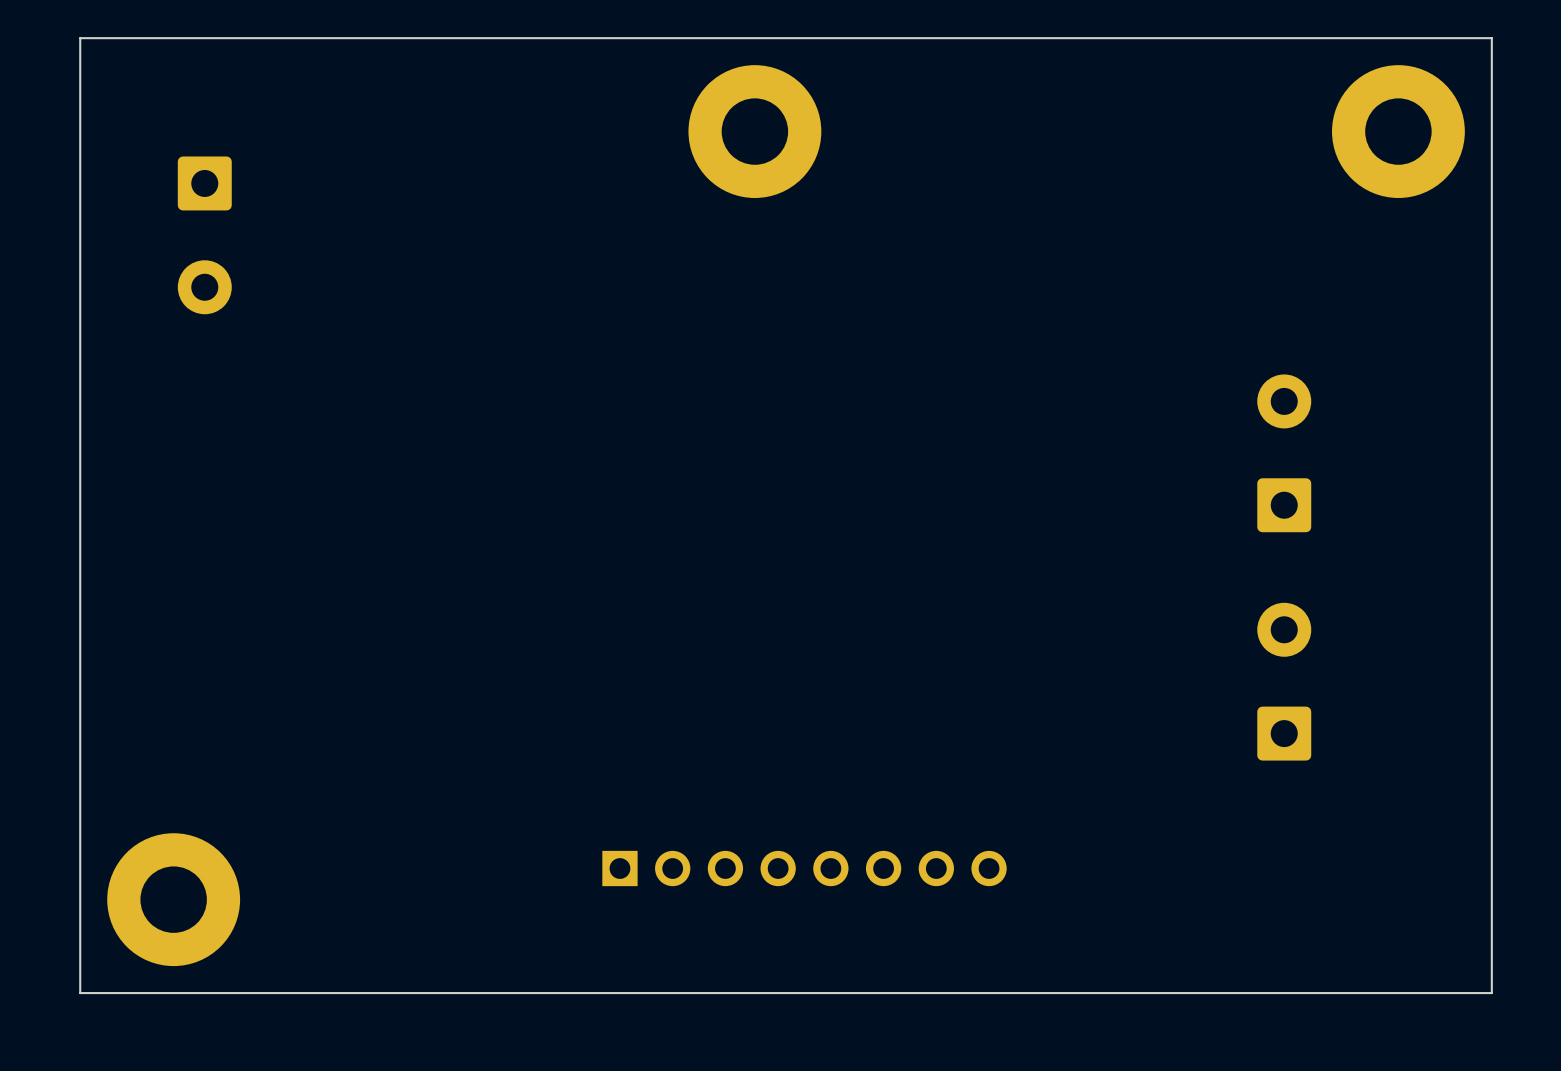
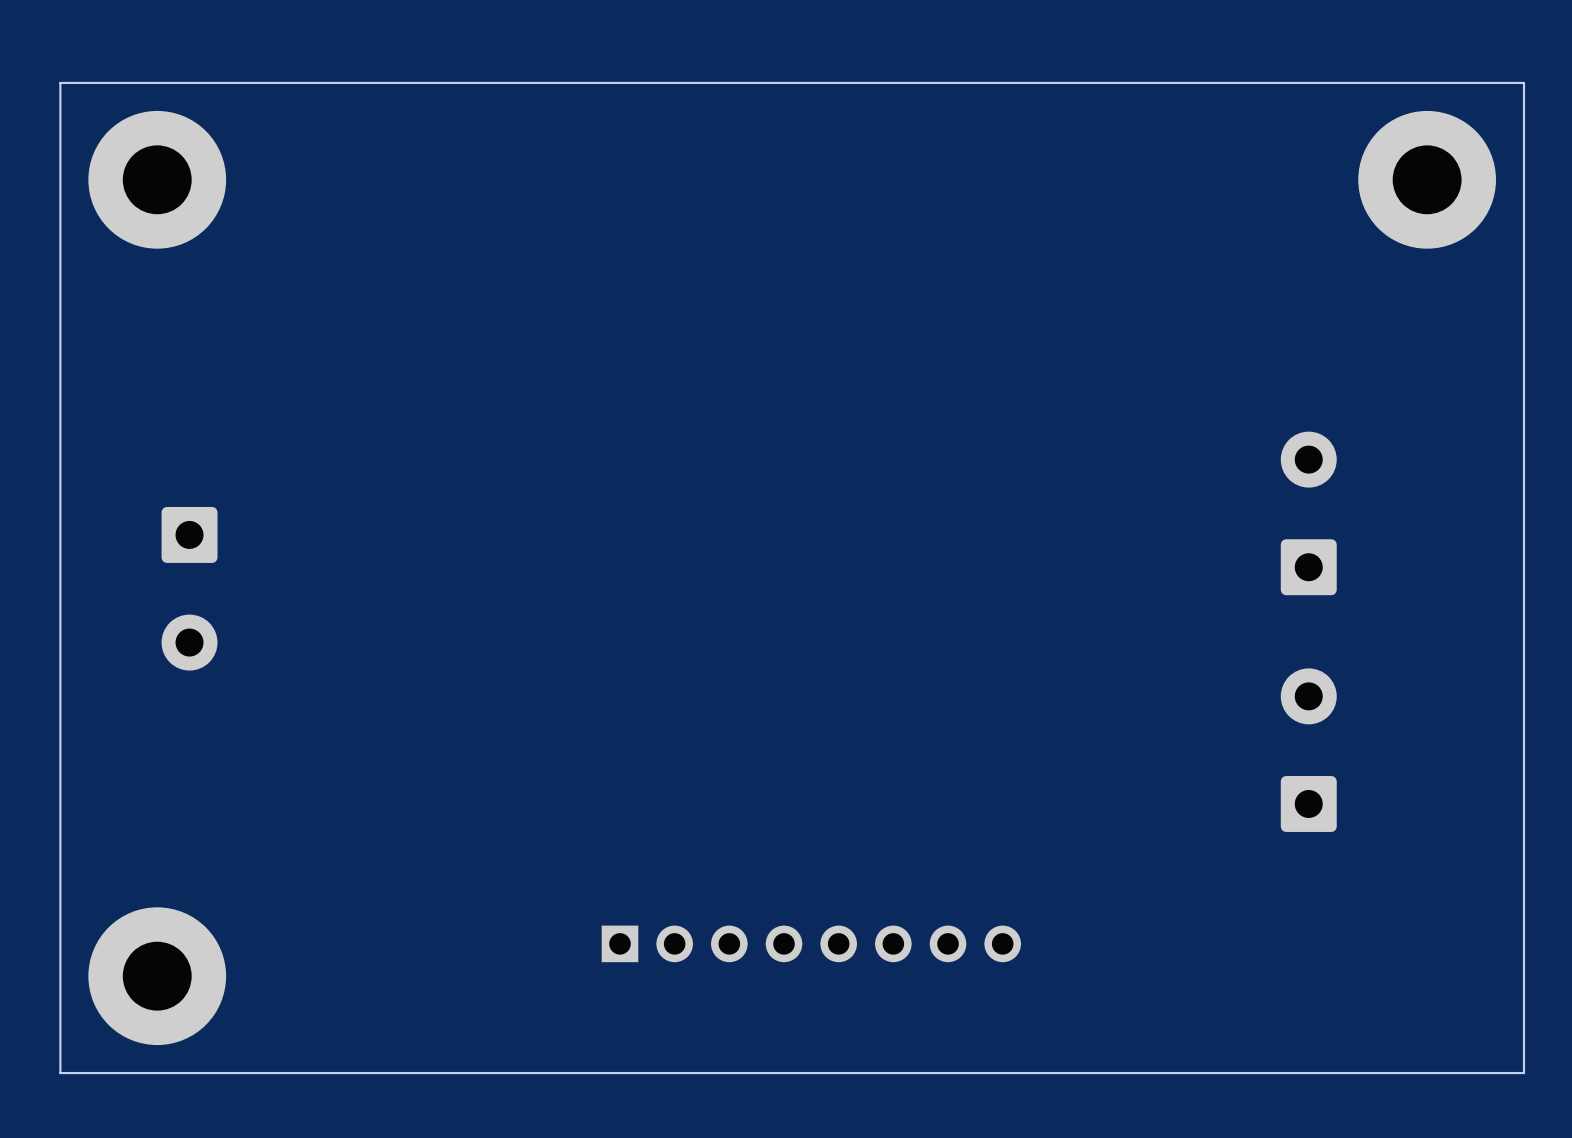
part: none -> (157, 179)
part: (754, 131) -> none
part position: (204, 235) -> (189, 588)

